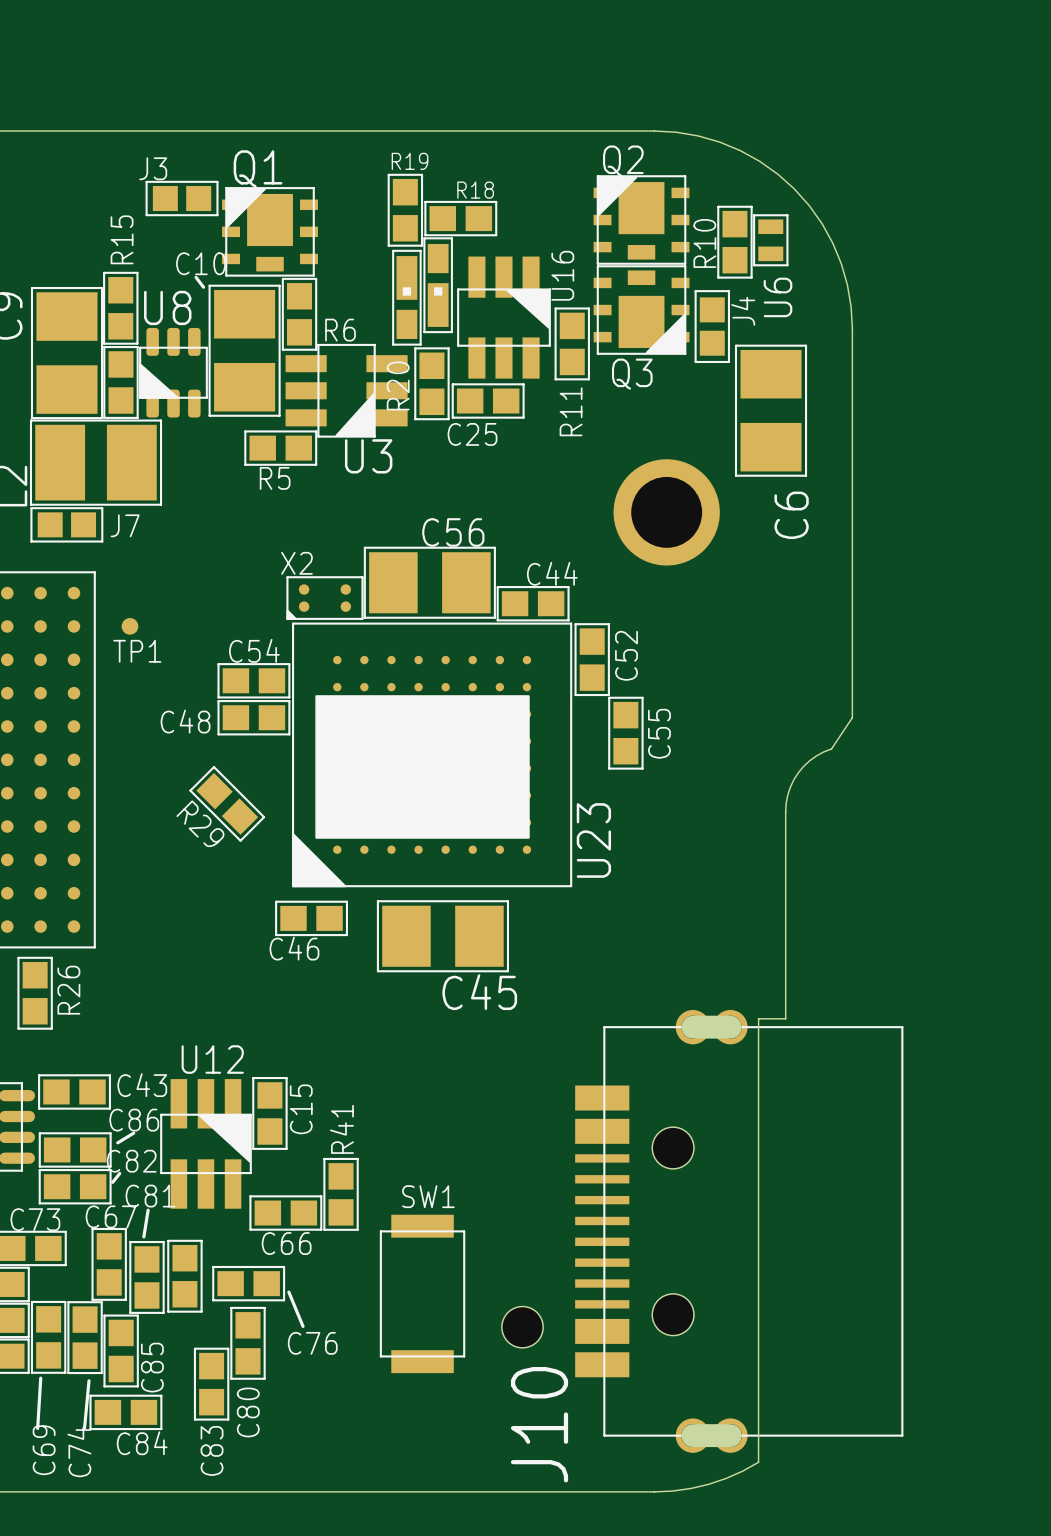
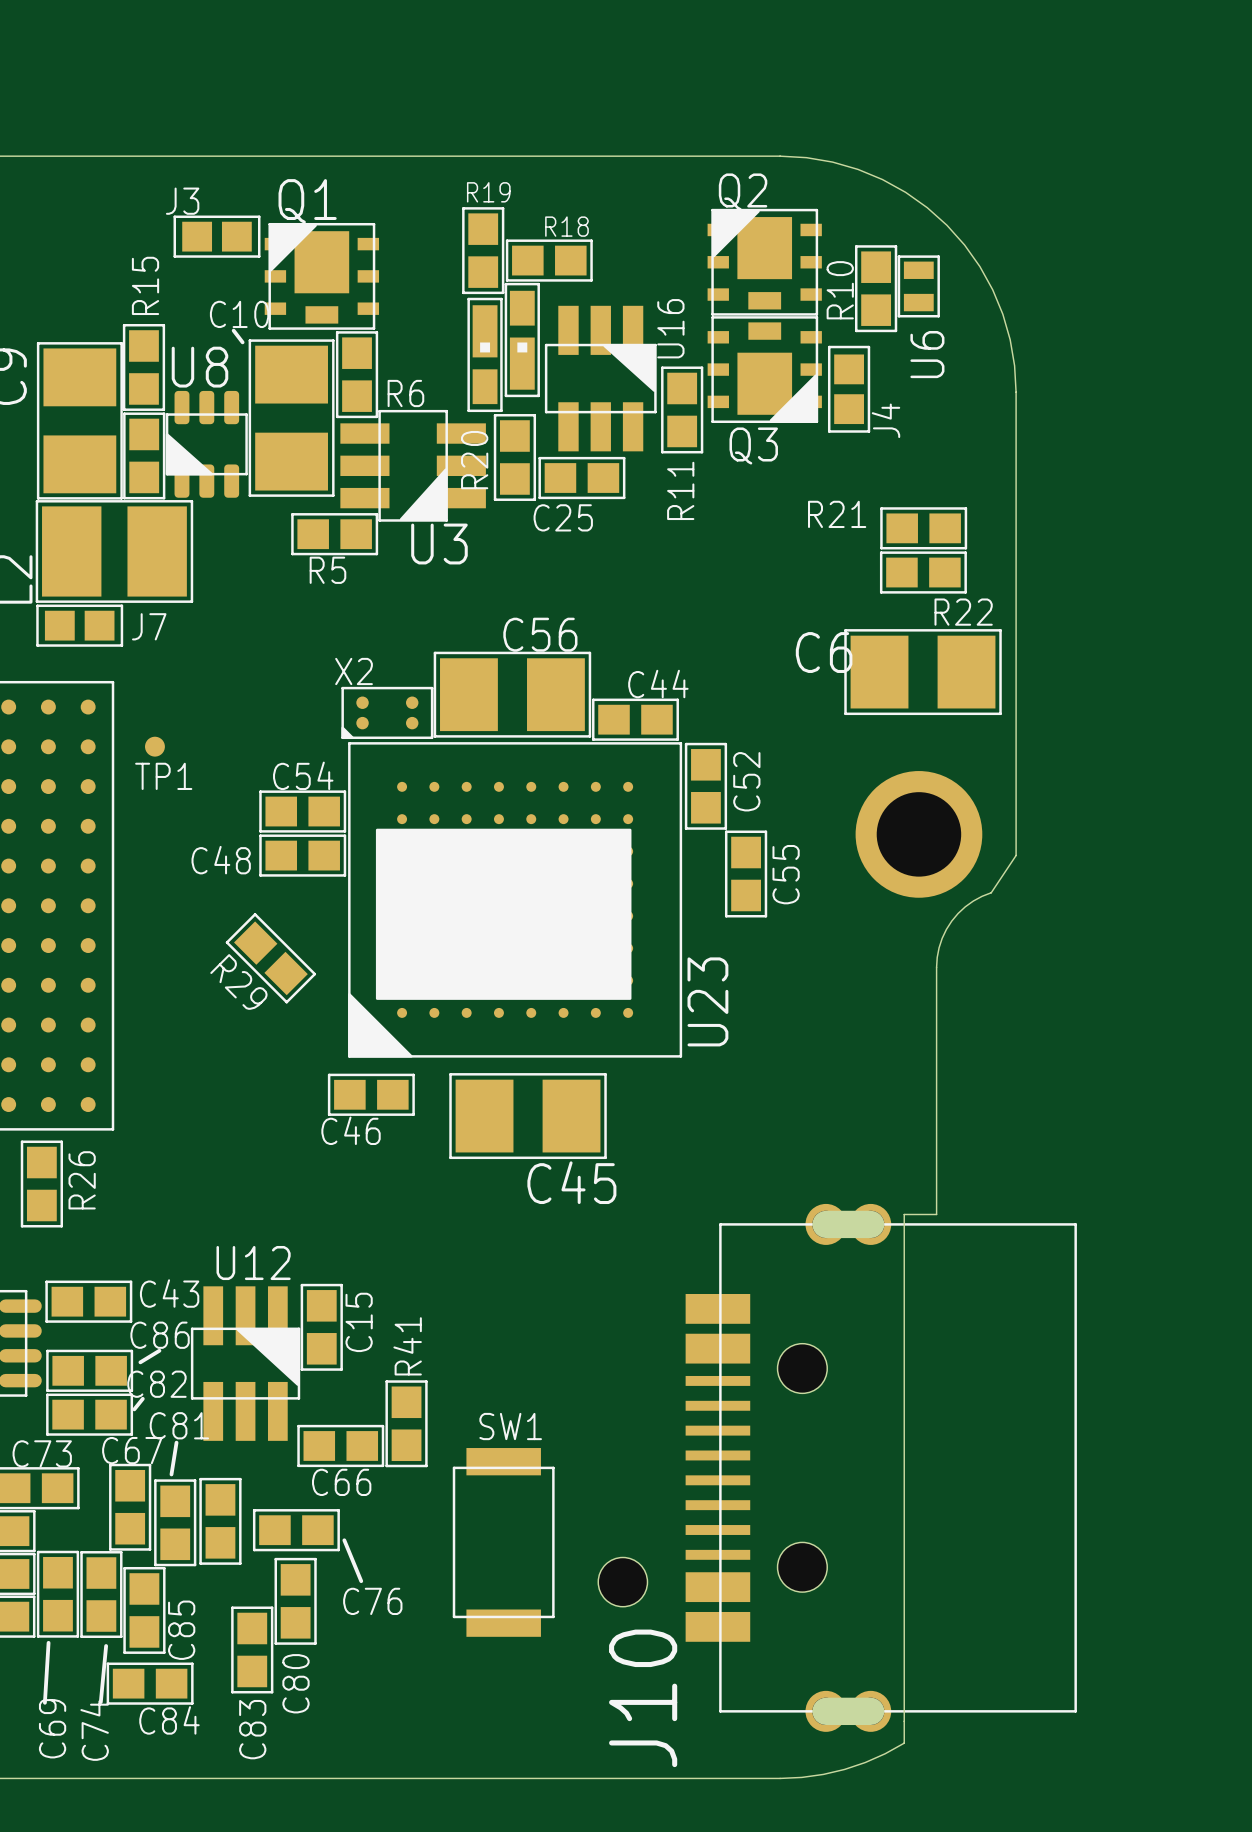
J4 name position: J4 (743, 311) -> J4 (885, 420)
C6 rotation: 0° (771, 410) -> 90° clockwise (923, 672)
C6 position: (771, 410) -> (923, 672)
R21: none -> (923, 528)
R22: none -> (923, 572)
part position: (666, 512) -> (918, 834)

